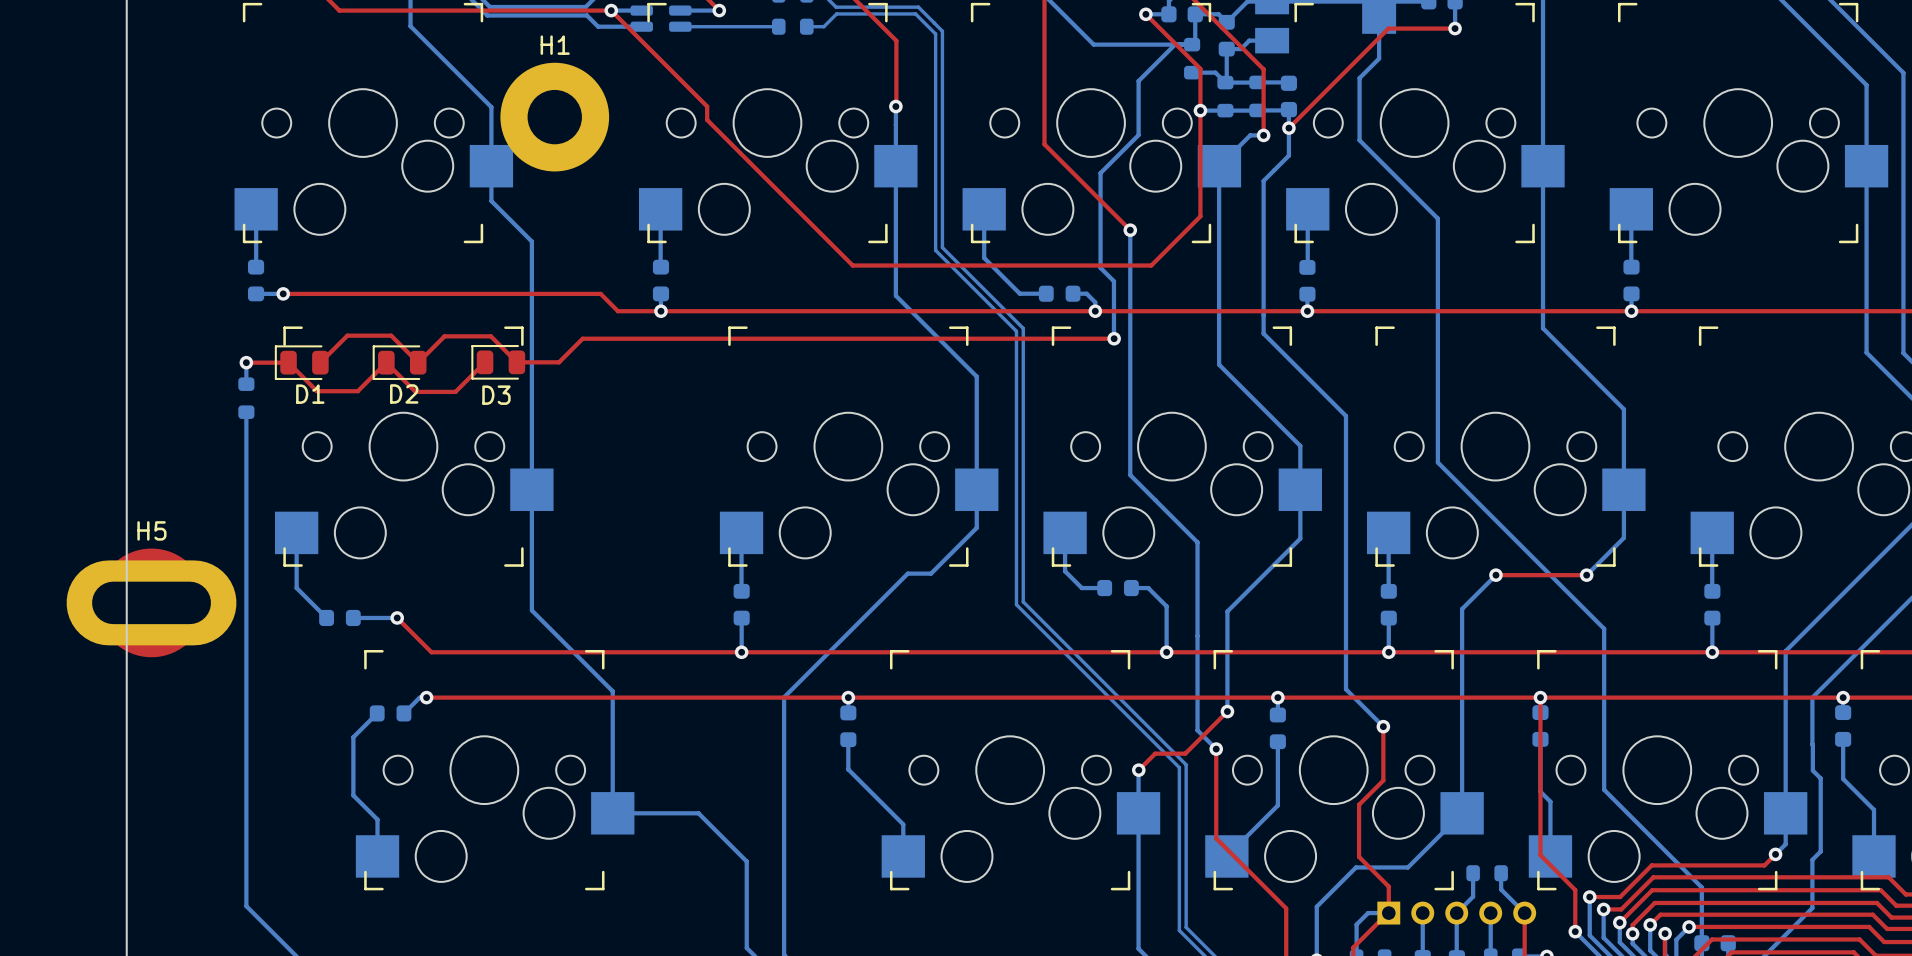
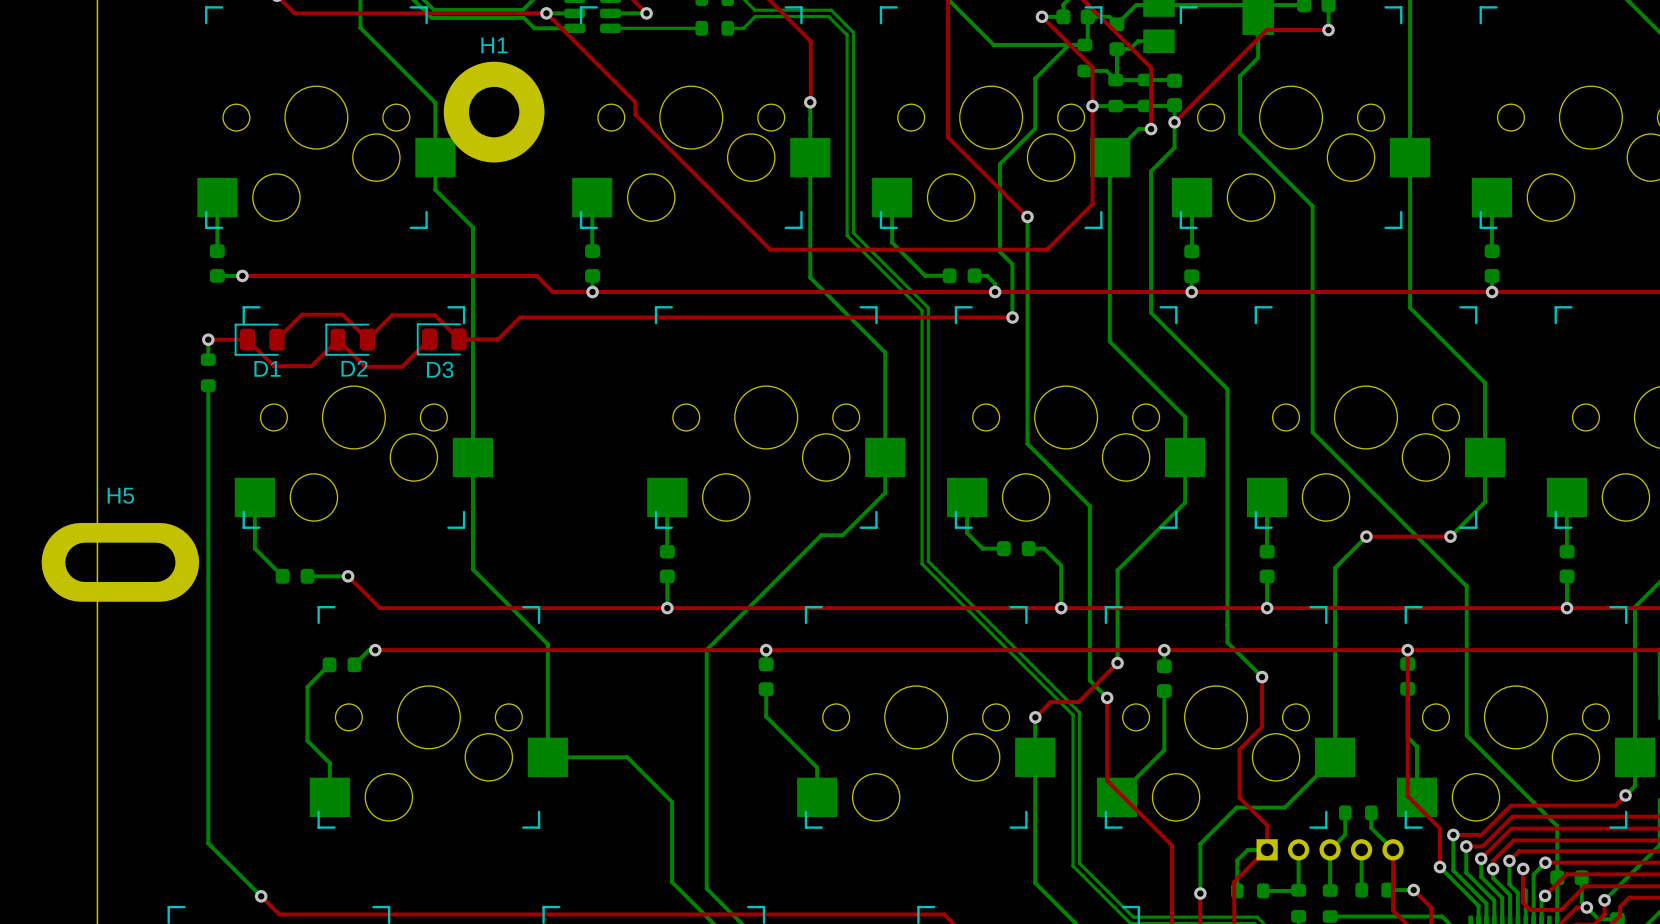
H5 footprint: [66, 548, 237, 658] -> [41, 522, 200, 602]

